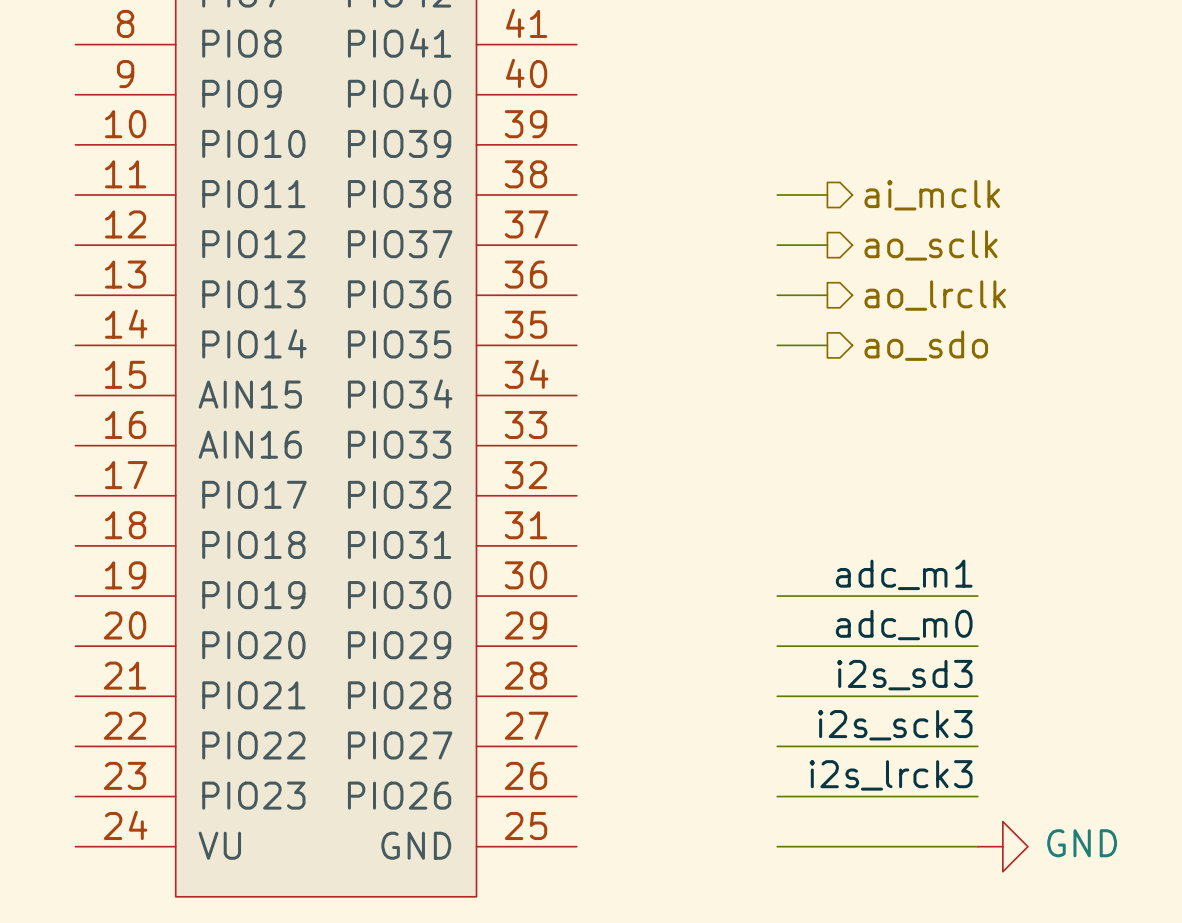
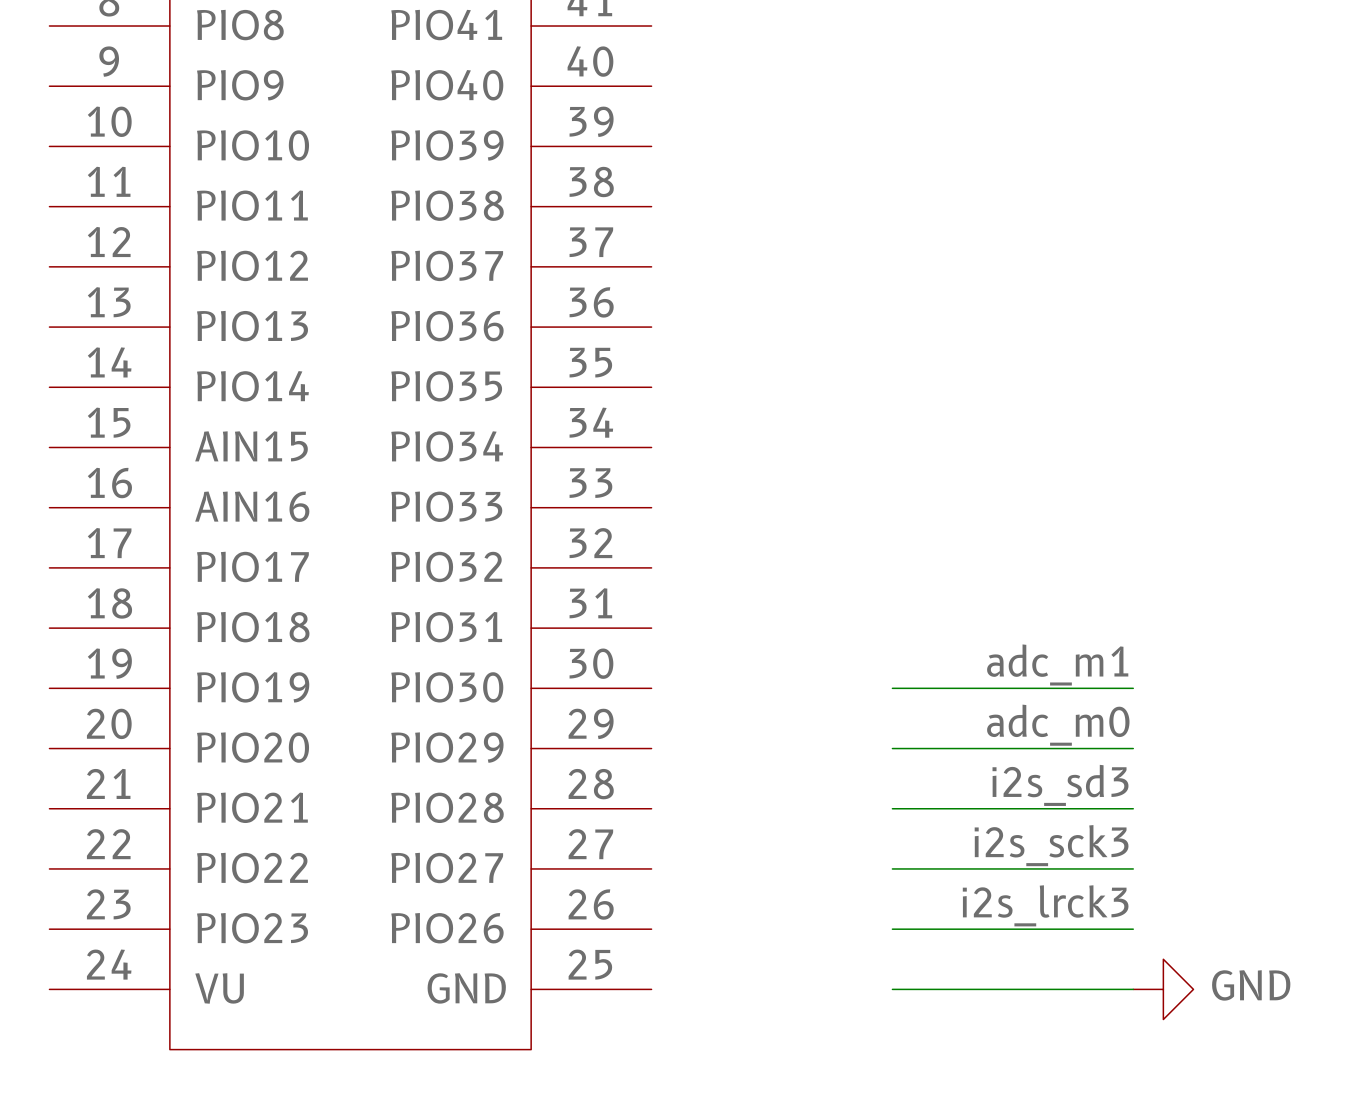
wire: (777, 195) (827, 195) -> none
hierarchical label: ai_mclk (932, 195) -> none
wire: (777, 245) (827, 245) -> none
hierarchical label: ao_sclk (931, 245) -> none
wire: (777, 295) (827, 295) -> none
hierarchical label: ao_lrclk (935, 295) -> none
wire: (777, 345) (827, 345) -> none
hierarchical label: ao_sdo (926, 345) -> none

